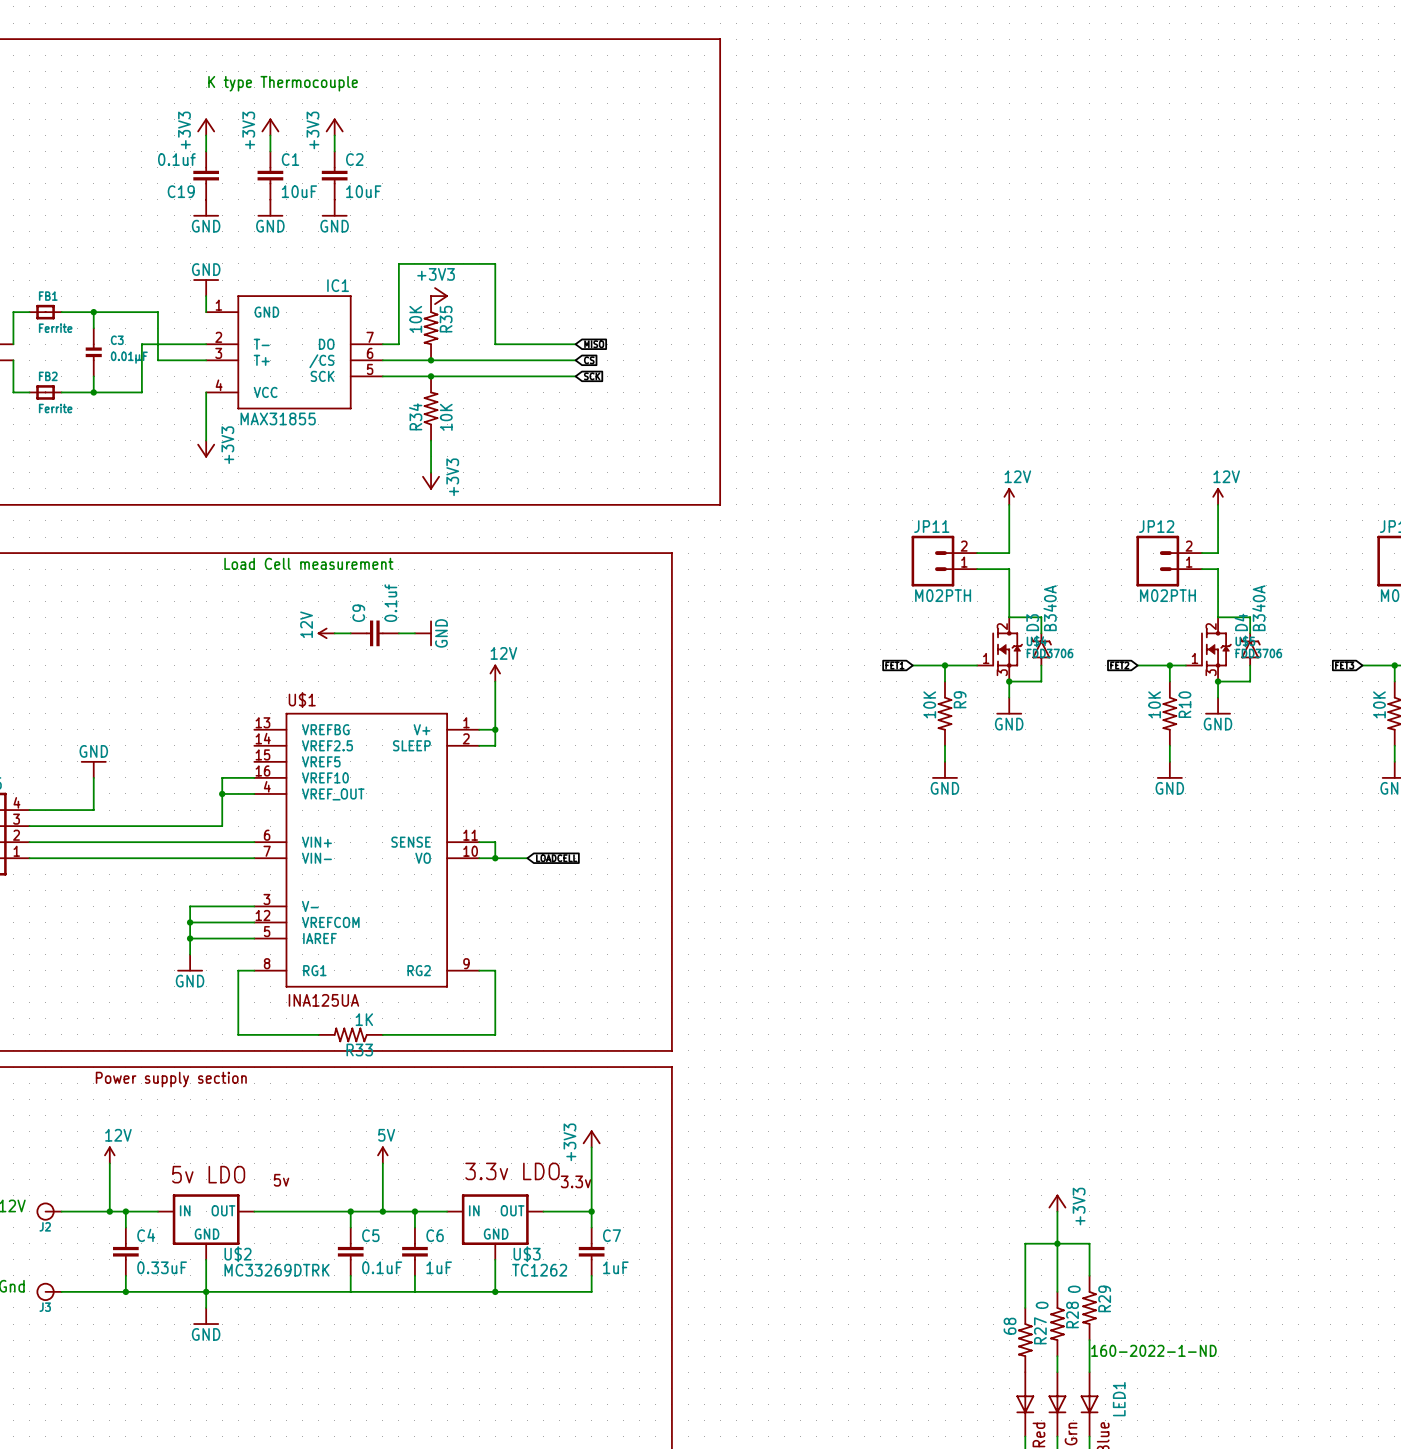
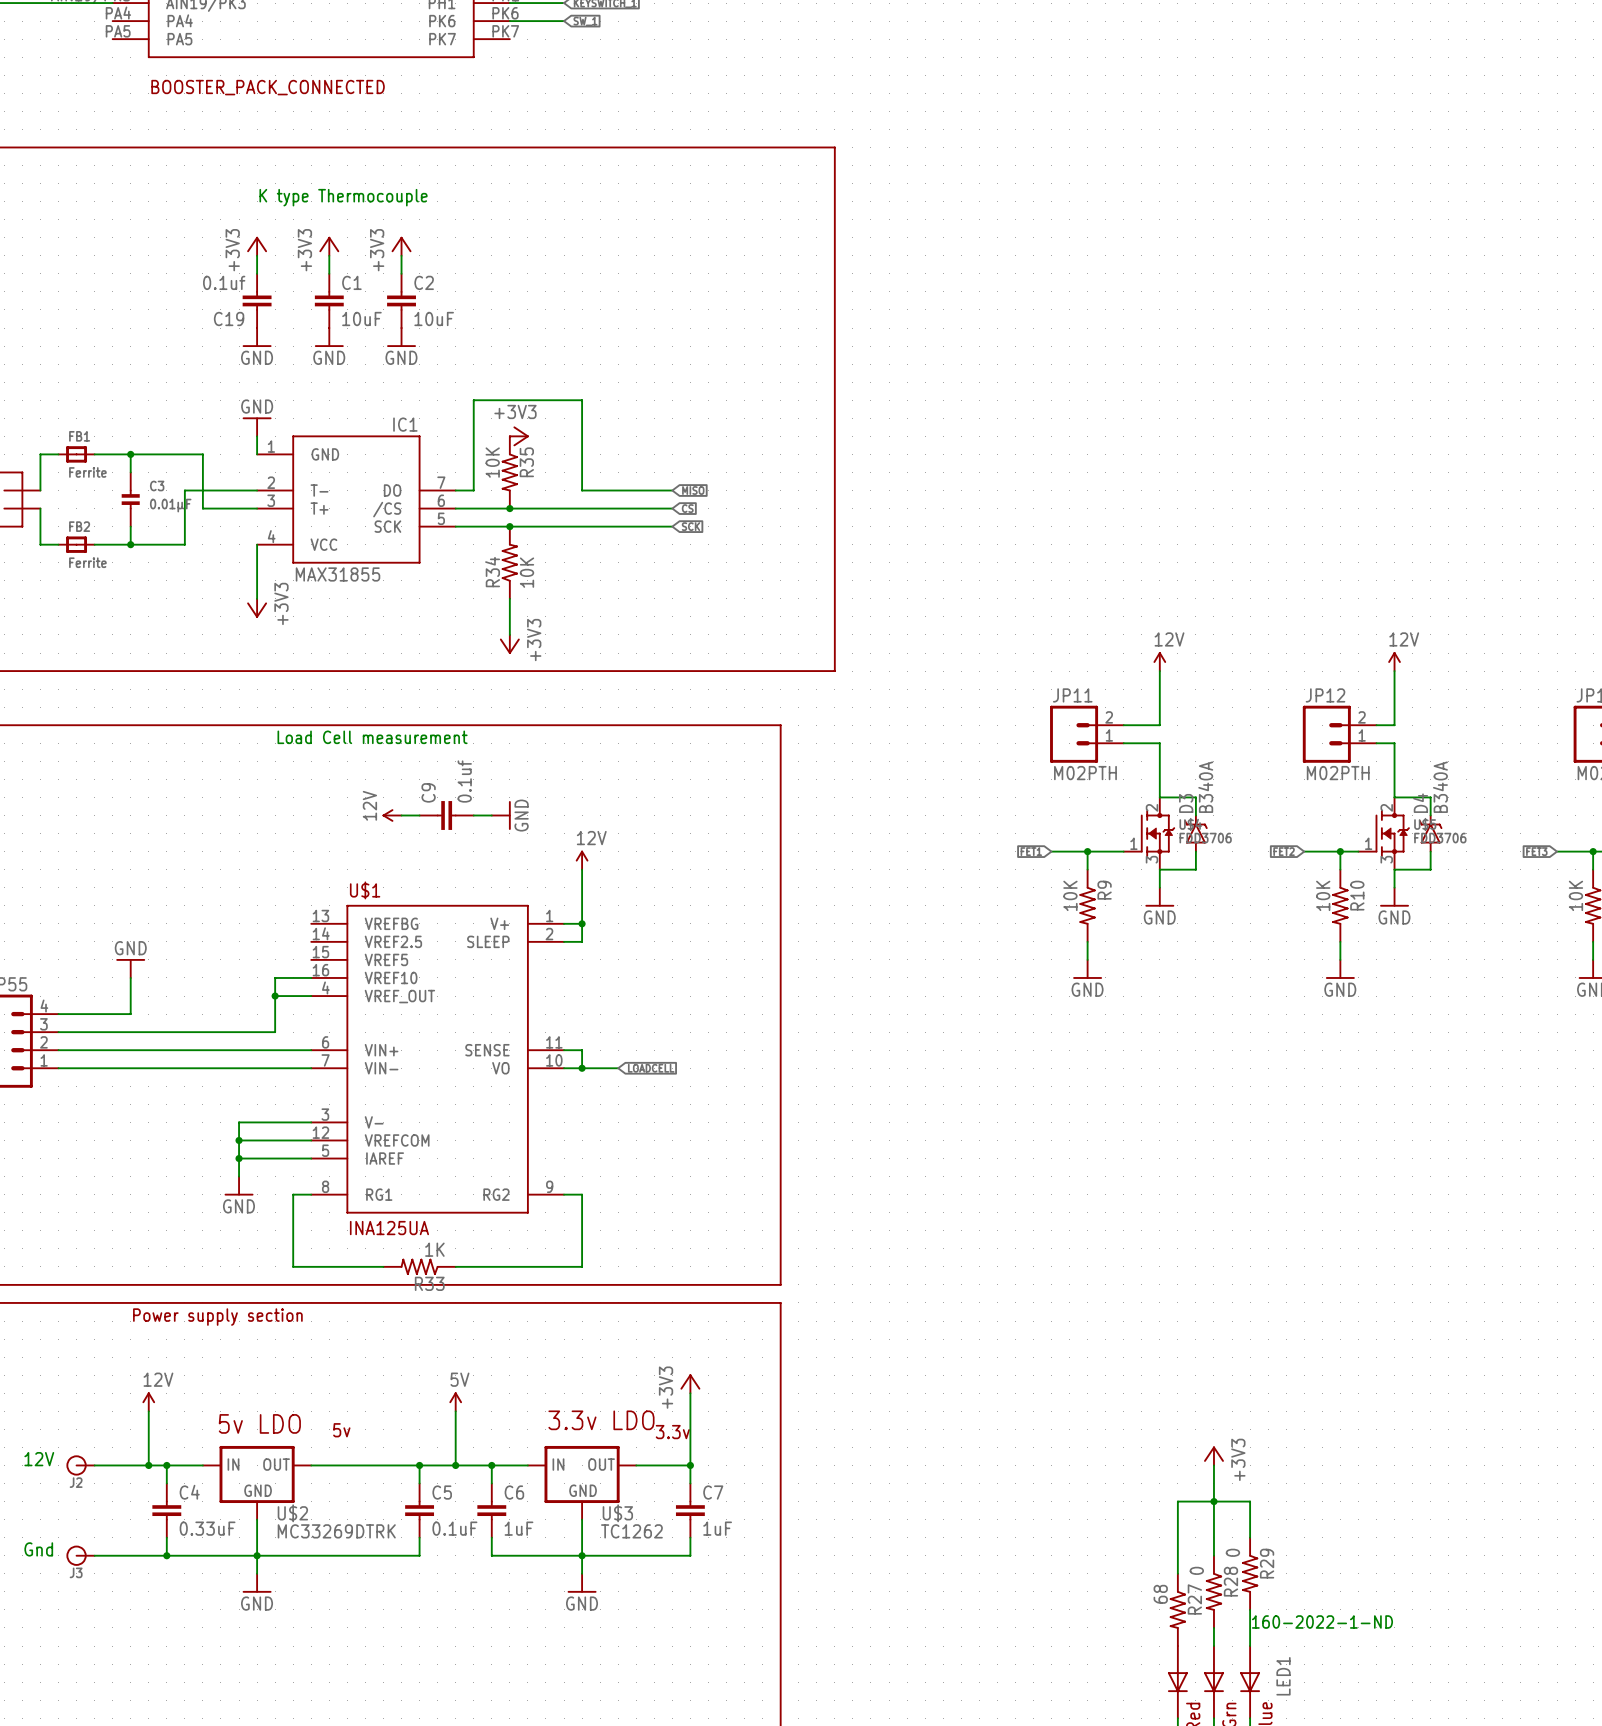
junction: (1009, 681) -> none
junction: (1218, 681) -> none
wire: (350, 1291) (414, 1291) -> none
wire: none -> (582, 1555) (582, 1573)
power symbol: none -> GND (582, 1583)

